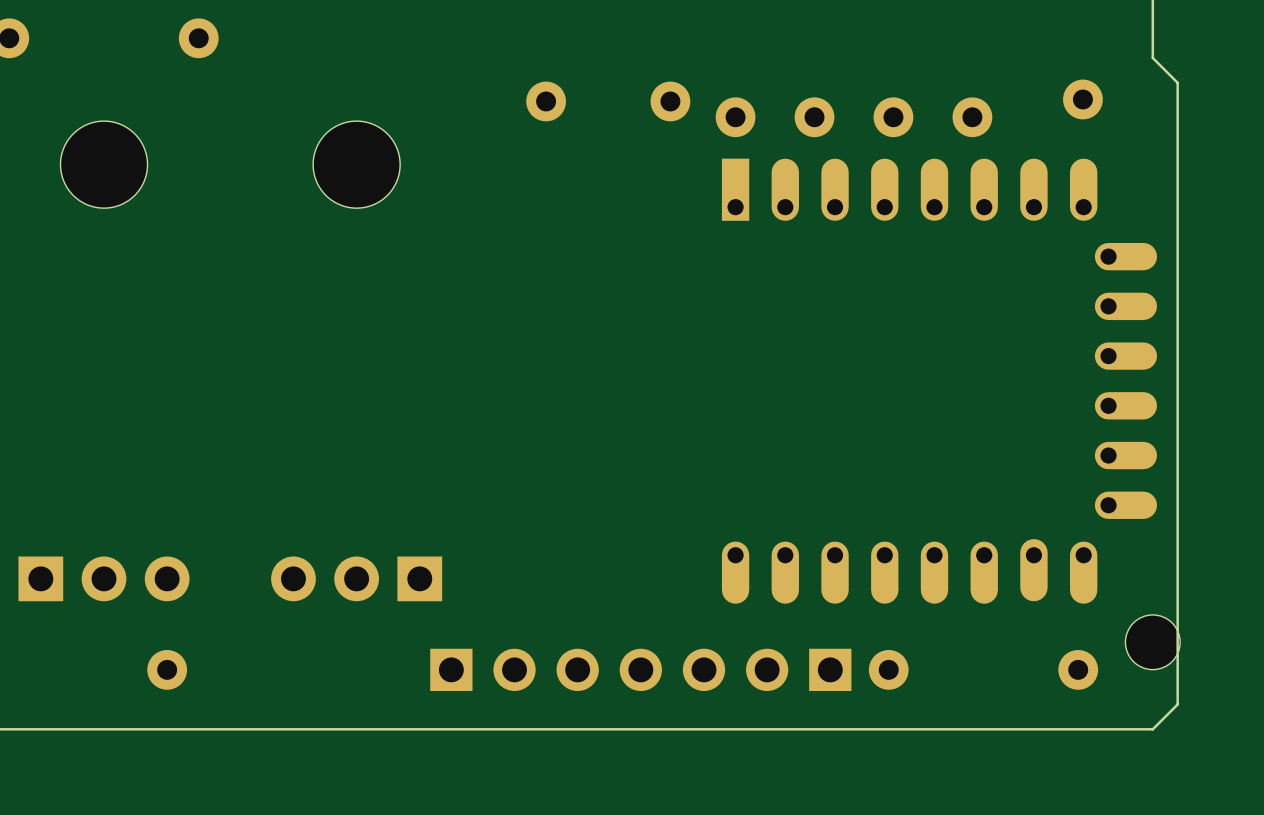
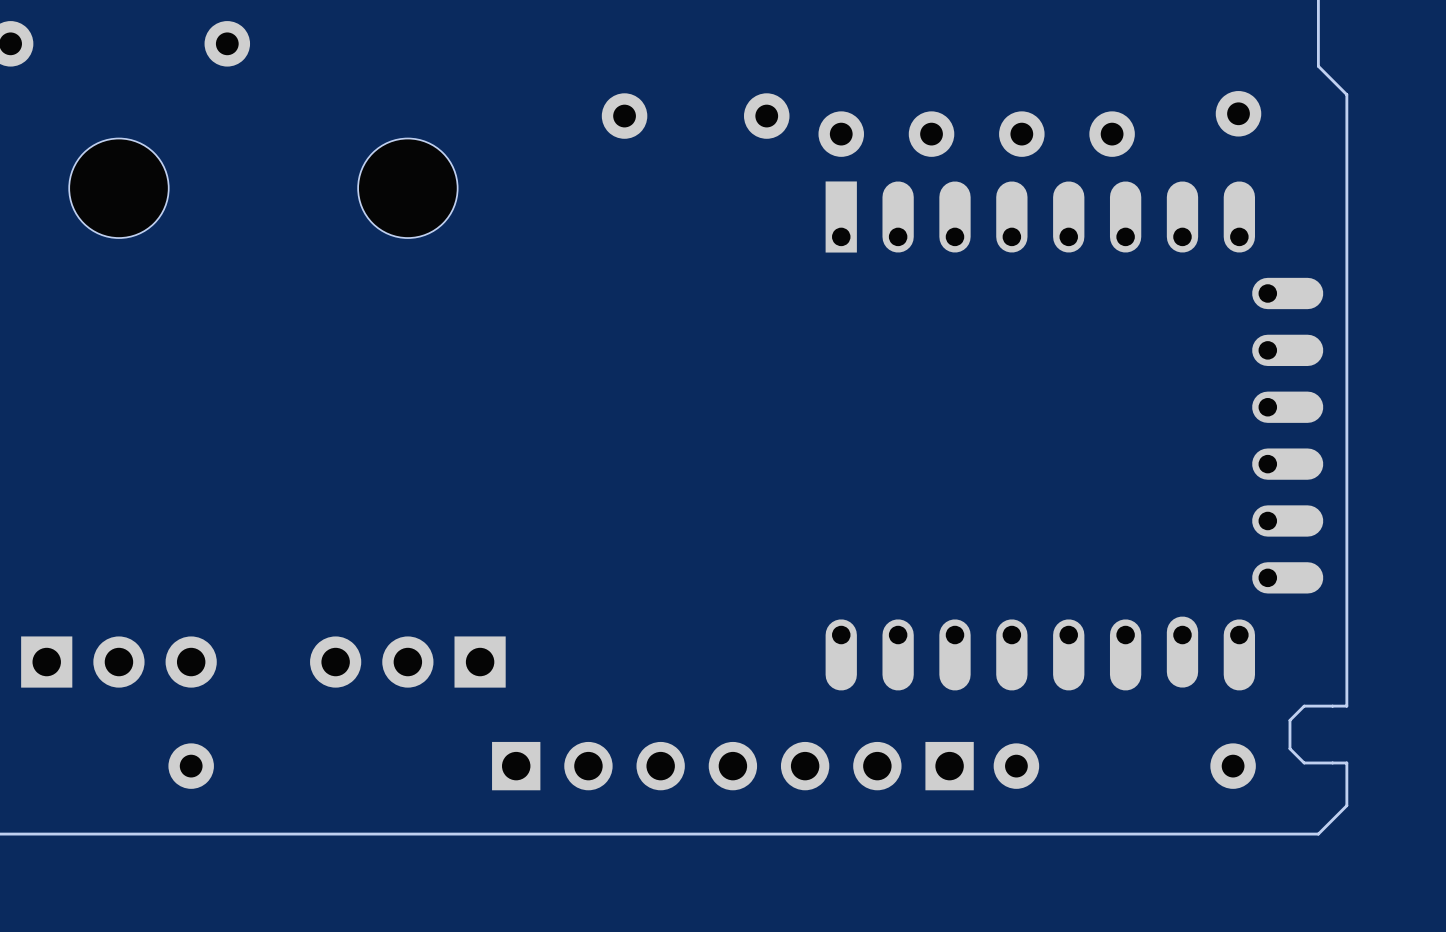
board edge: (1177, 617) (1177, 667) -> (1346, 706) (1304, 706) (1289, 720) (1289, 748) (1304, 762) (1346, 762)
part: (1152, 642) -> none

